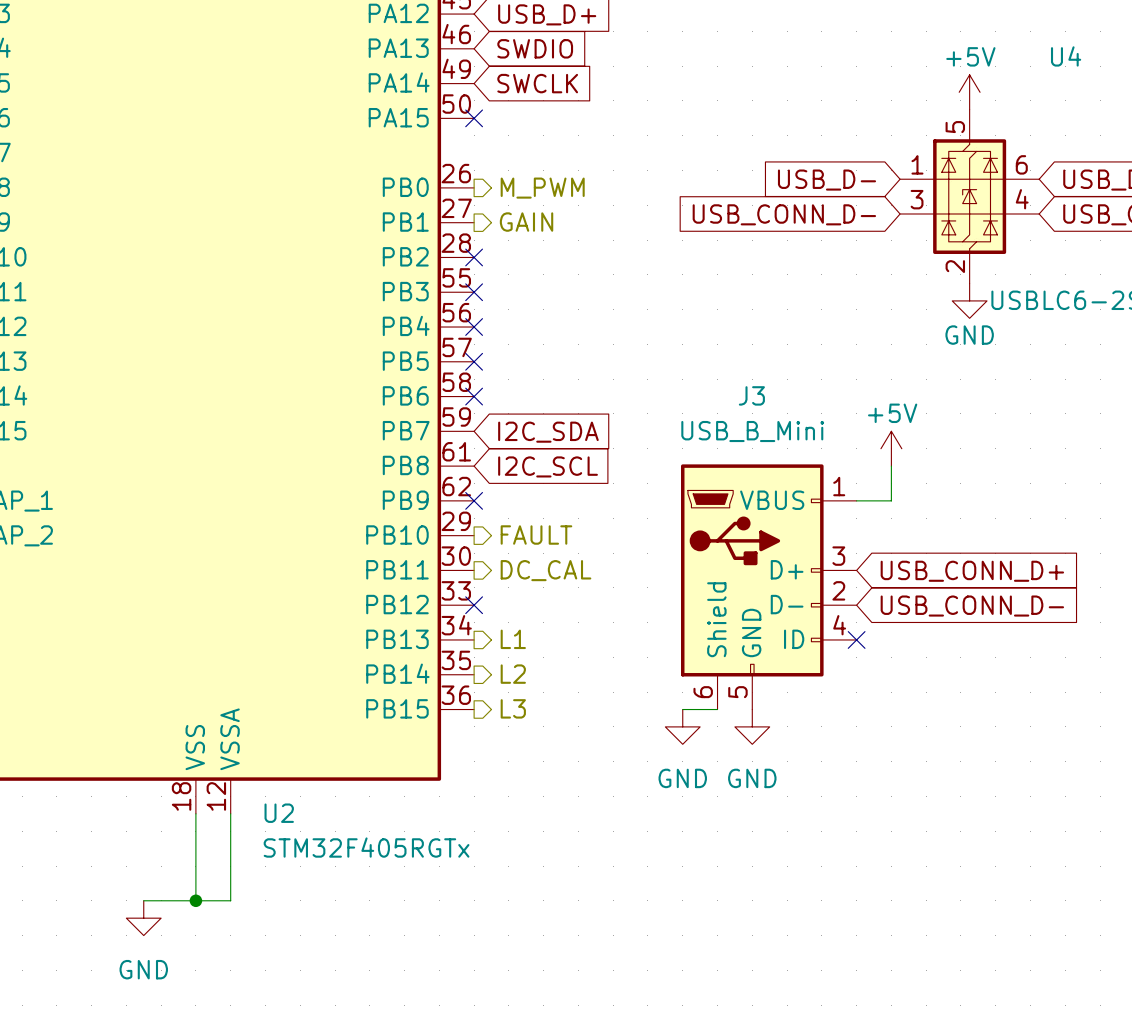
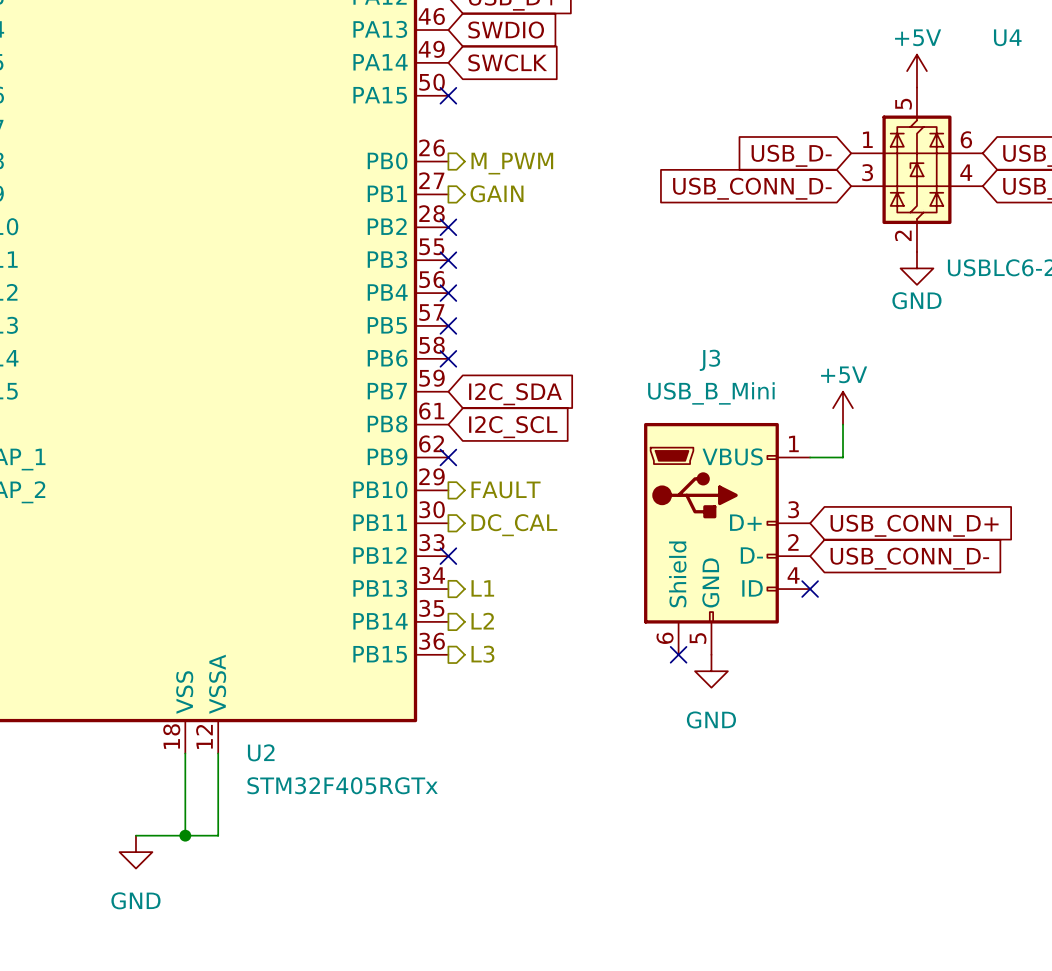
wire: (682, 709) (717, 709) -> none
no-connect mark: none -> (678, 654)
power symbol: GND (682, 726) -> none

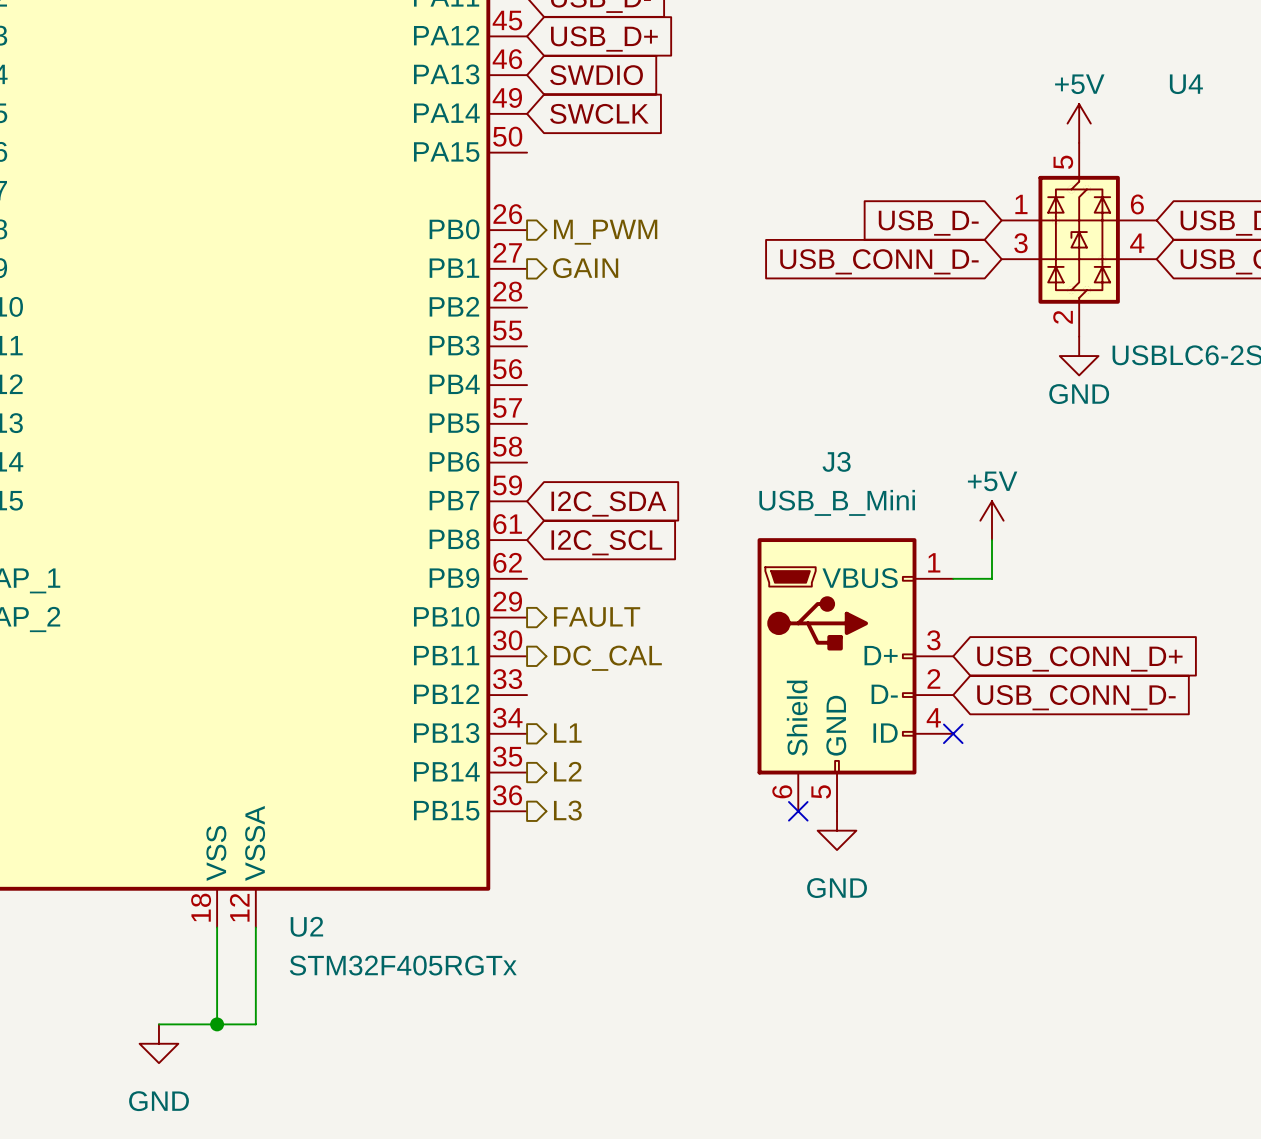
no-connect mark: (448, 95) -> none
no-connect mark: (448, 227) -> none
no-connect mark: (448, 260) -> none
no-connect mark: (448, 293) -> none
no-connect mark: (448, 325) -> none
no-connect mark: (448, 358) -> none
no-connect mark: (448, 457) -> none
no-connect mark: (448, 556) -> none

